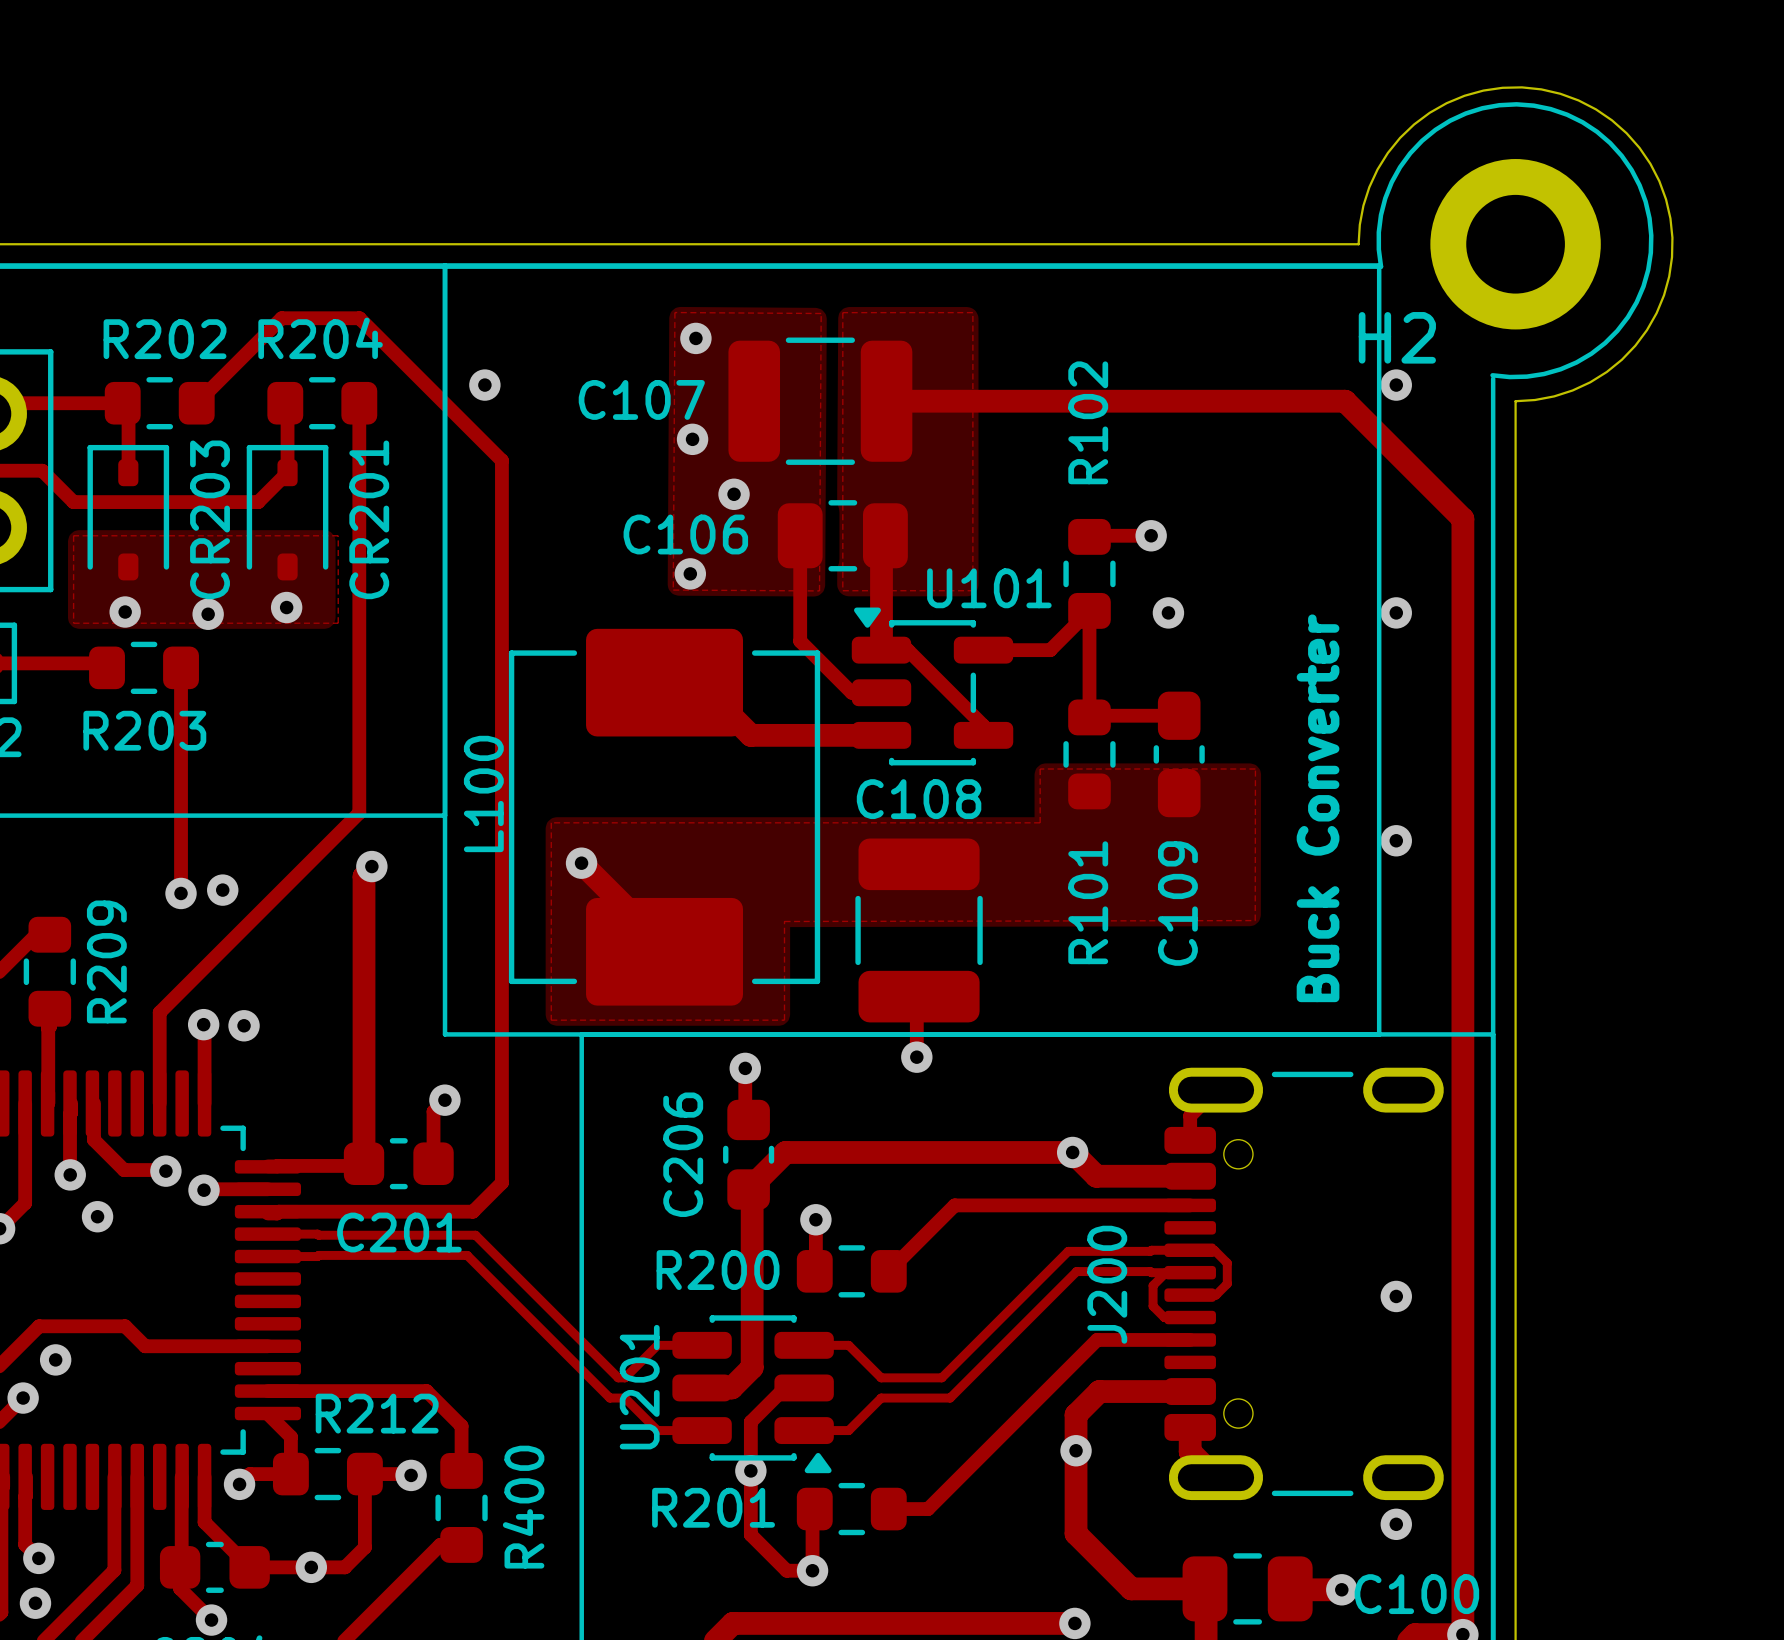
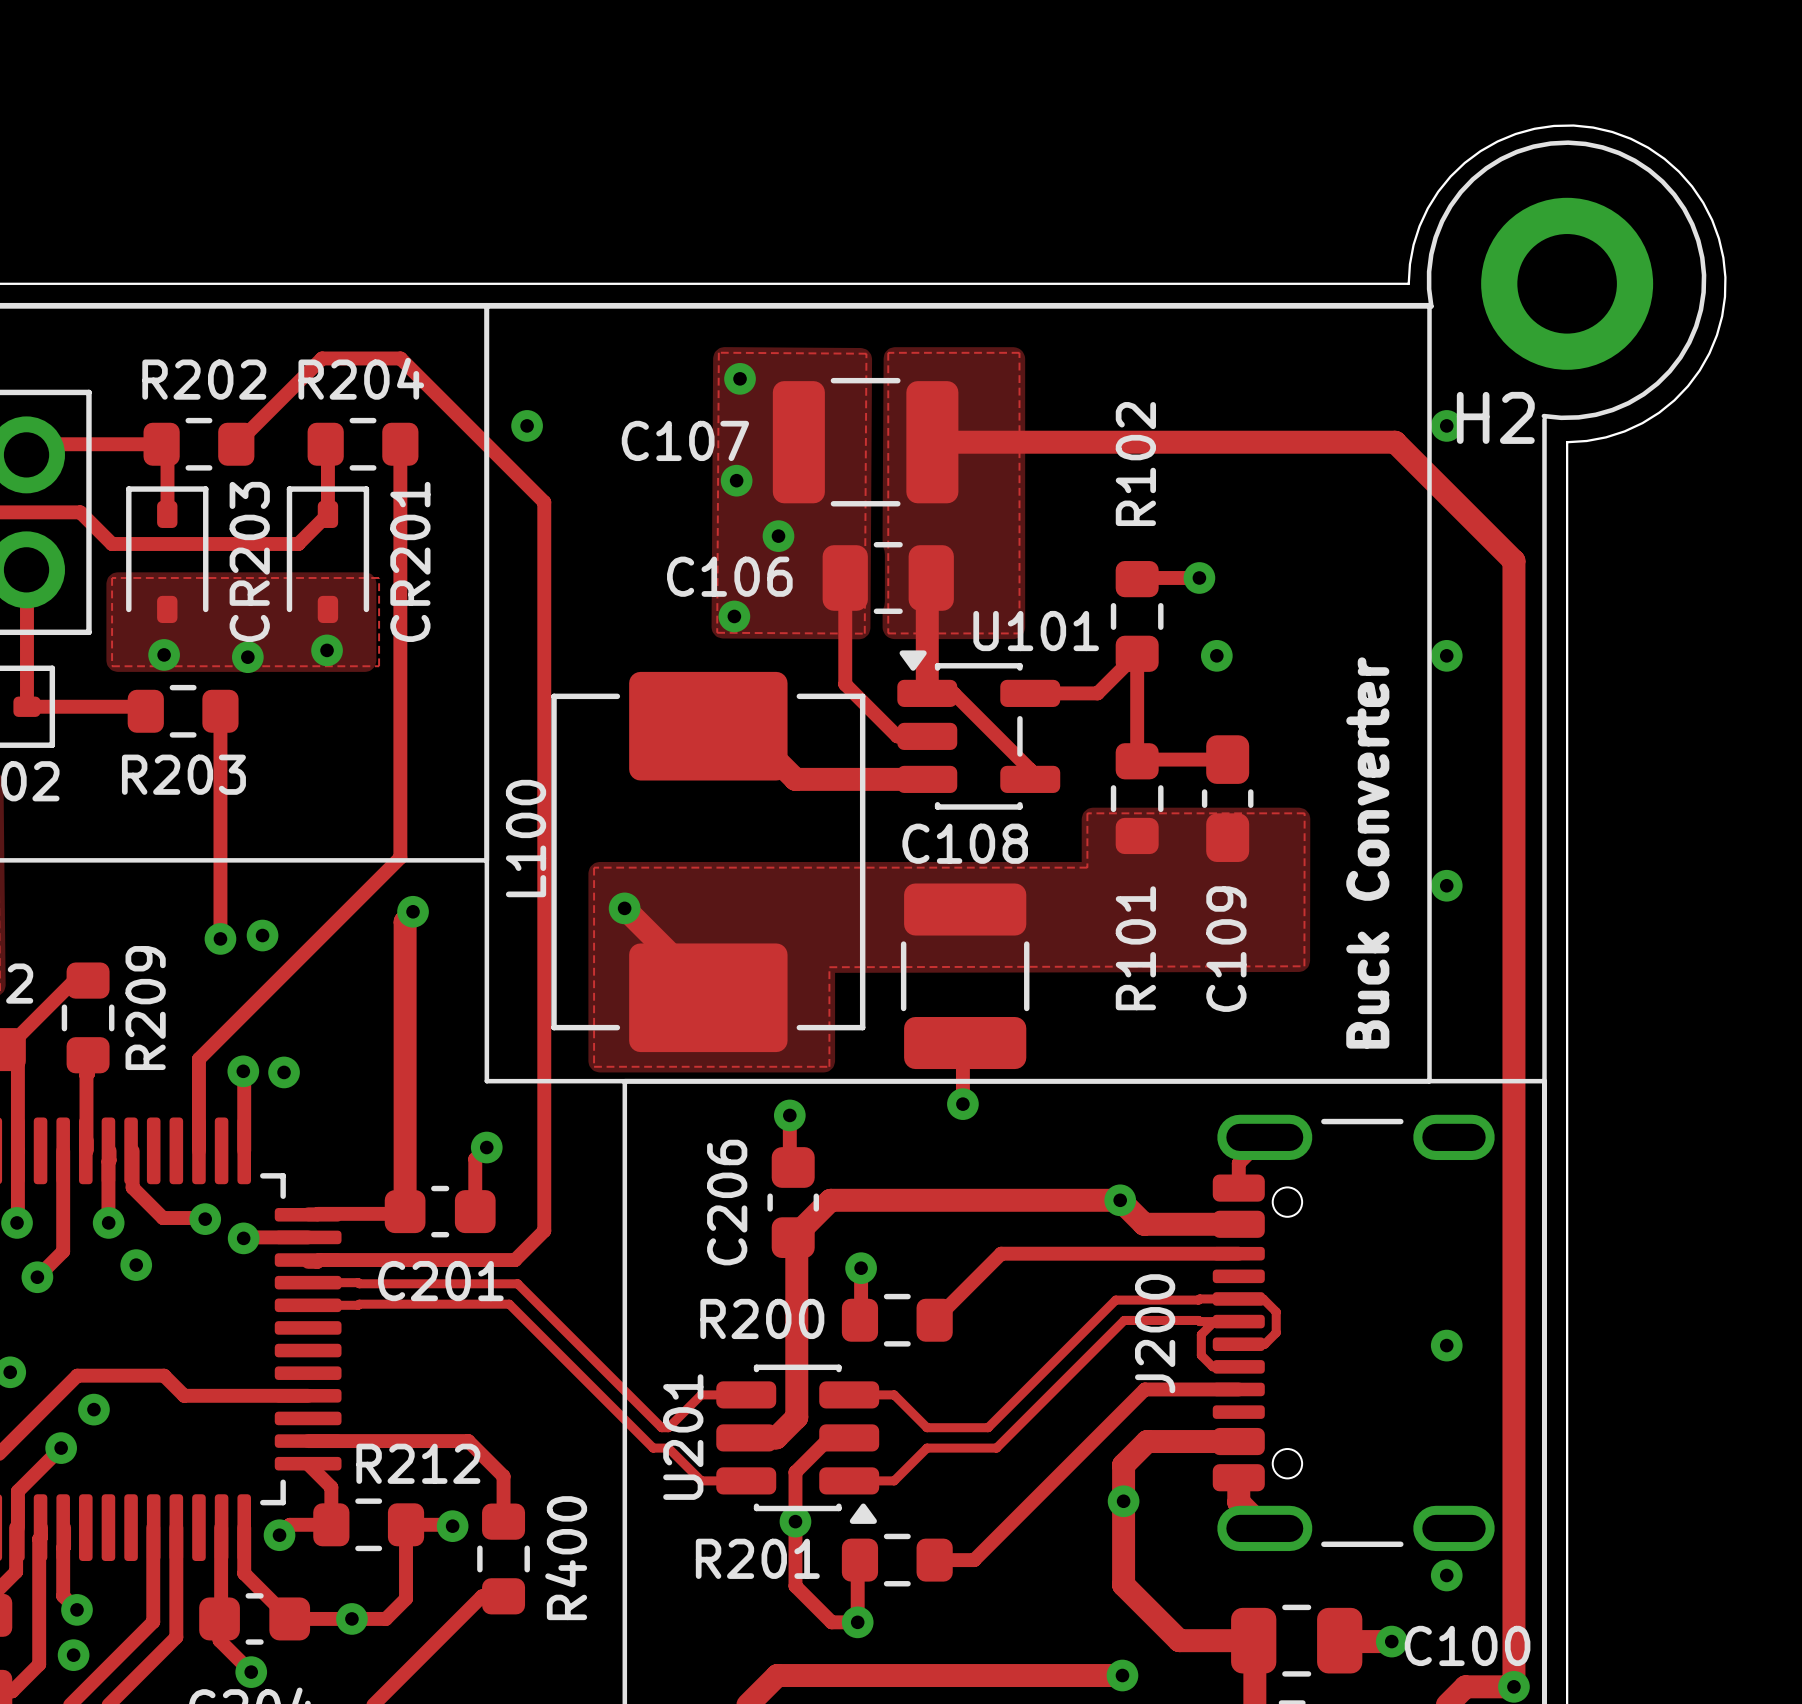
H2 name position: H2 (1397, 337) -> H2 (1495, 417)

